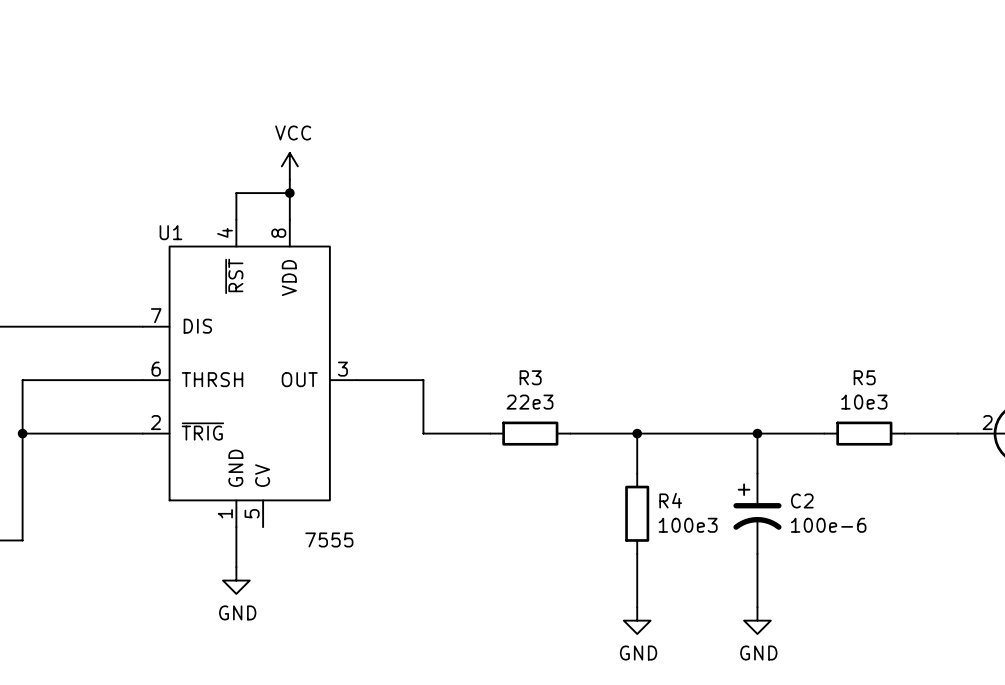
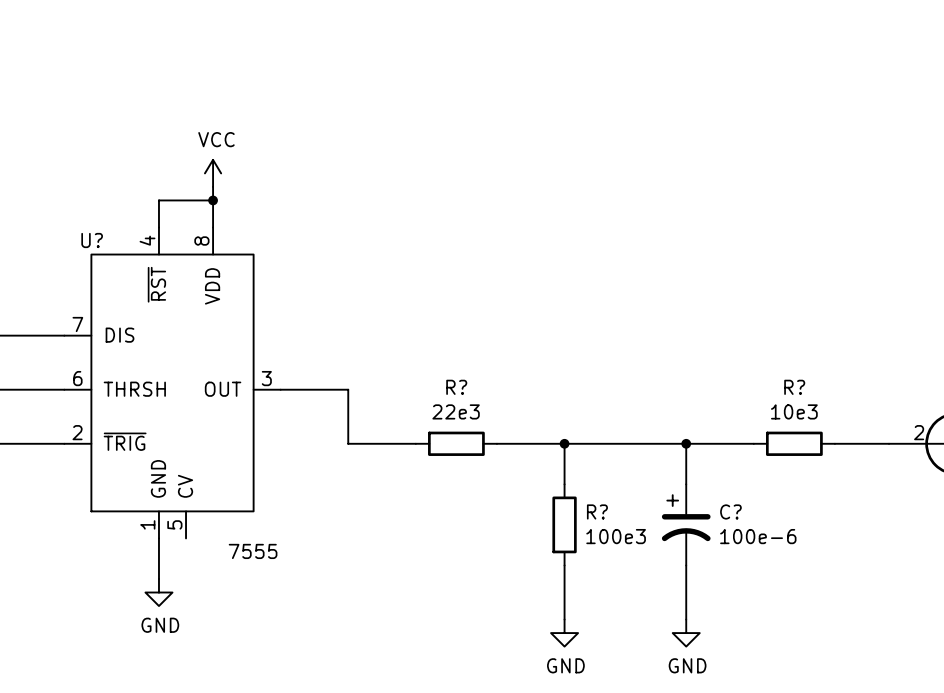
U1 name: U1 (170, 232) -> U? (92, 240)
R3 name: R3 (530, 377) -> R? (456, 387)
R5 name: R5 (864, 377) -> R? (794, 387)
R4 name: R4 (670, 500) -> R? (597, 511)
C2 name: C2 (802, 500) -> C? (730, 511)

